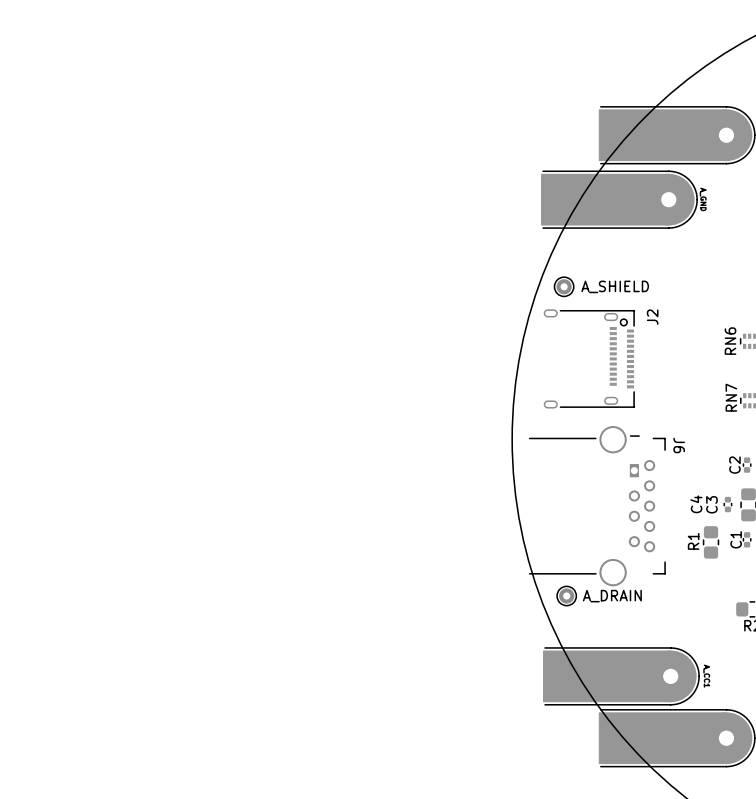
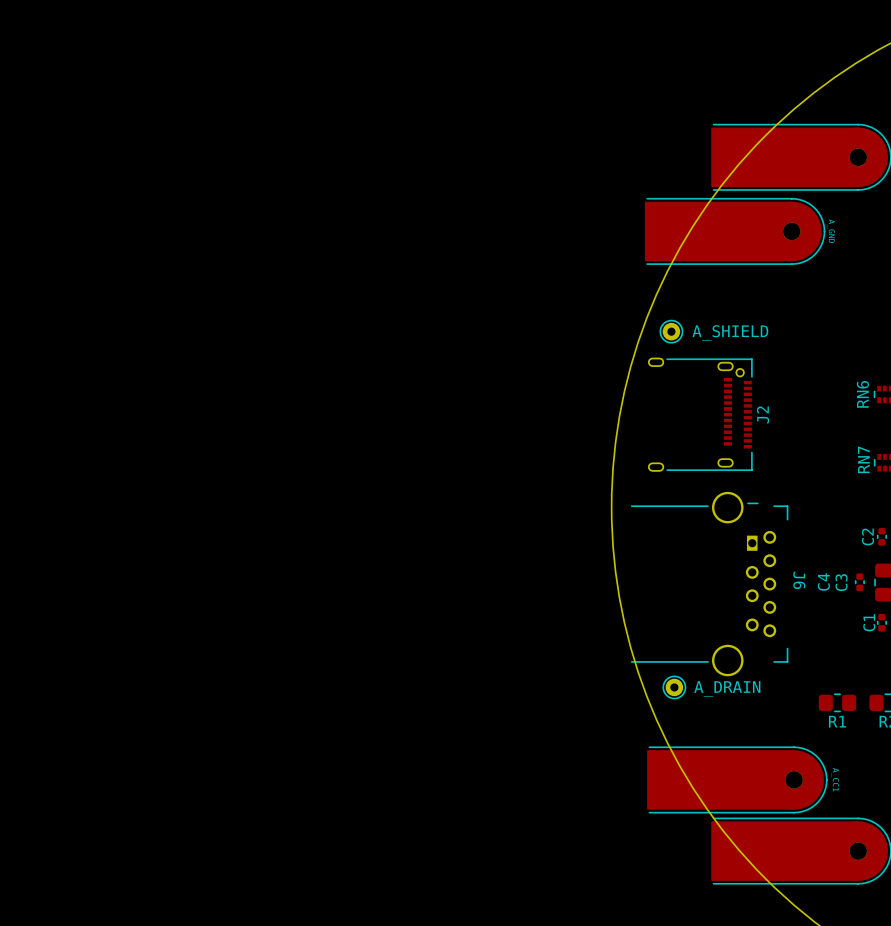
J2 name position: J2 (652, 317) -> J2 (763, 414)
J6 name position: J6 (679, 445) -> J6 (799, 580)
R1 name position: R1 (693, 541) -> R1 (837, 721)
R1 rotation: 0° (711, 542) -> 90° clockwise (837, 702)
R1 position: (711, 542) -> (837, 702)

